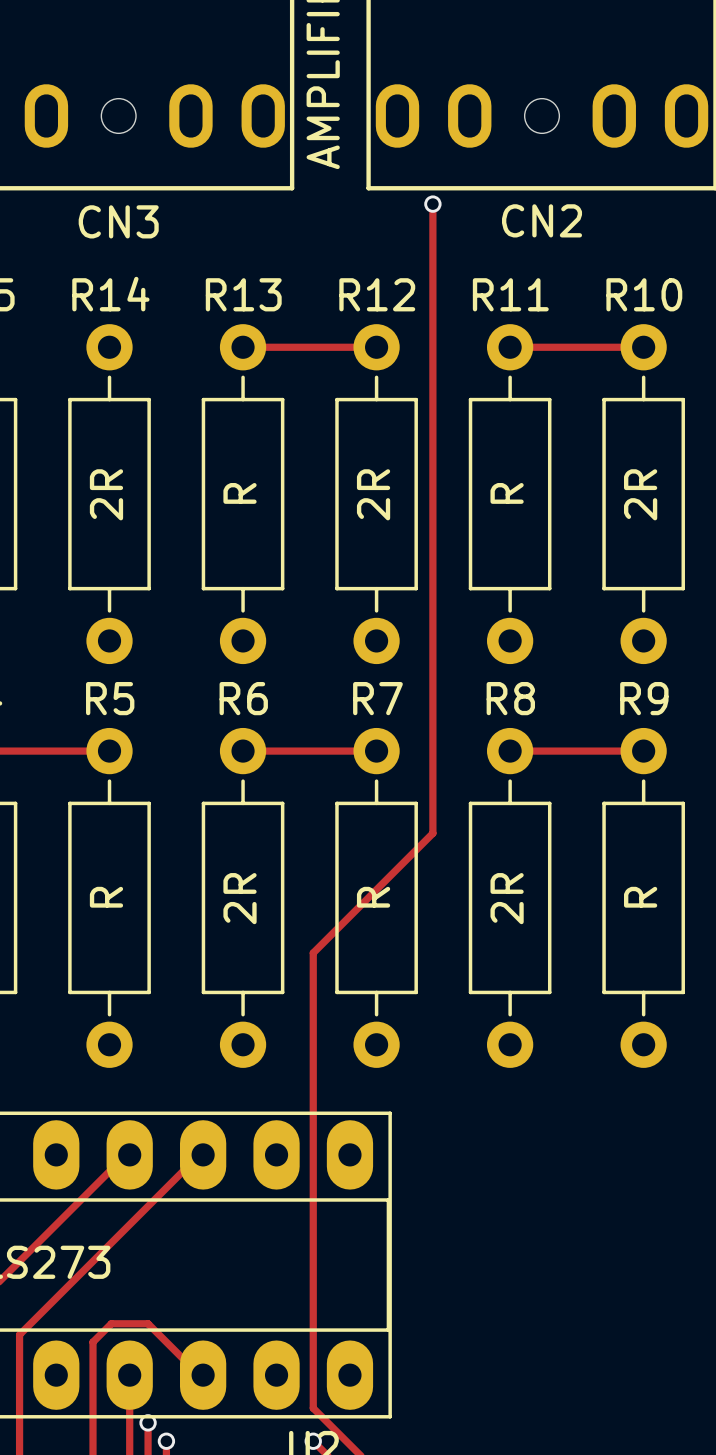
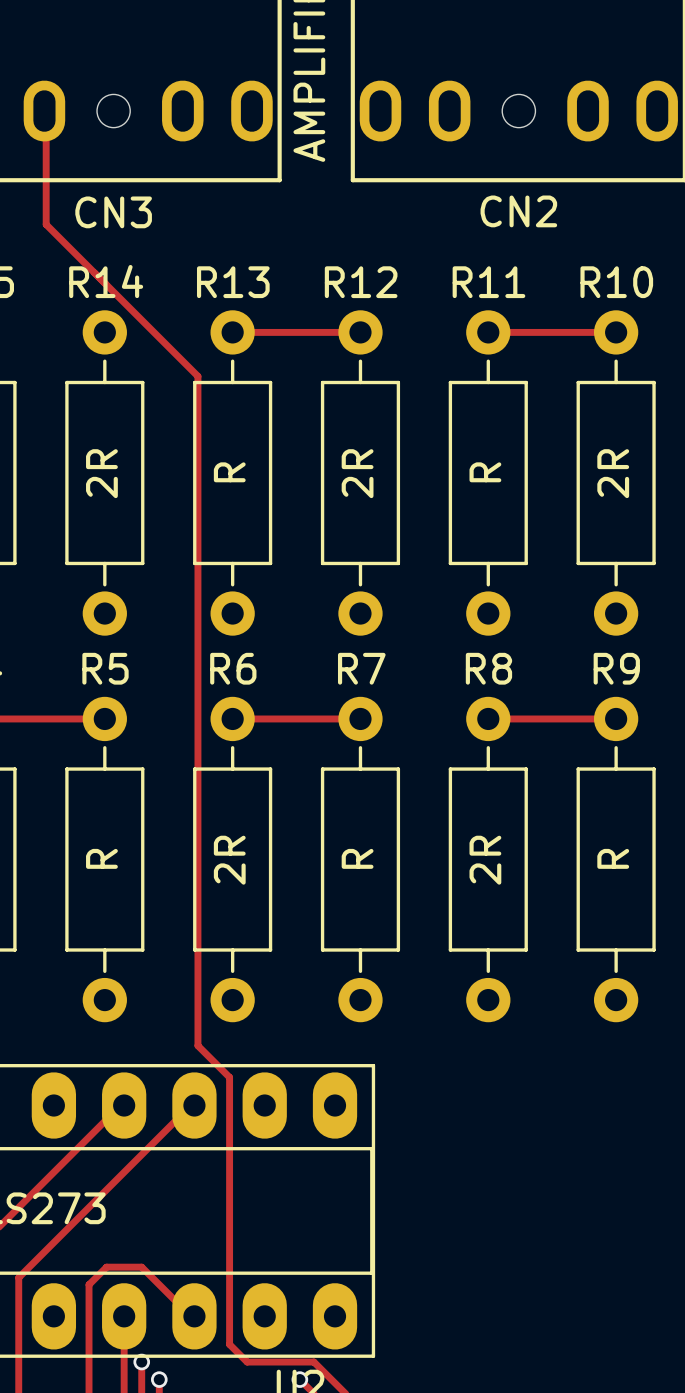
track: (432, 204) (432, 833) (313, 952) (313, 1408) (327, 1422) -> (46, 110) (46, 224) (197, 376) (197, 1045) (229, 1077) (229, 1344) (247, 1362) (313, 1362)
via: (432, 204) -> none

